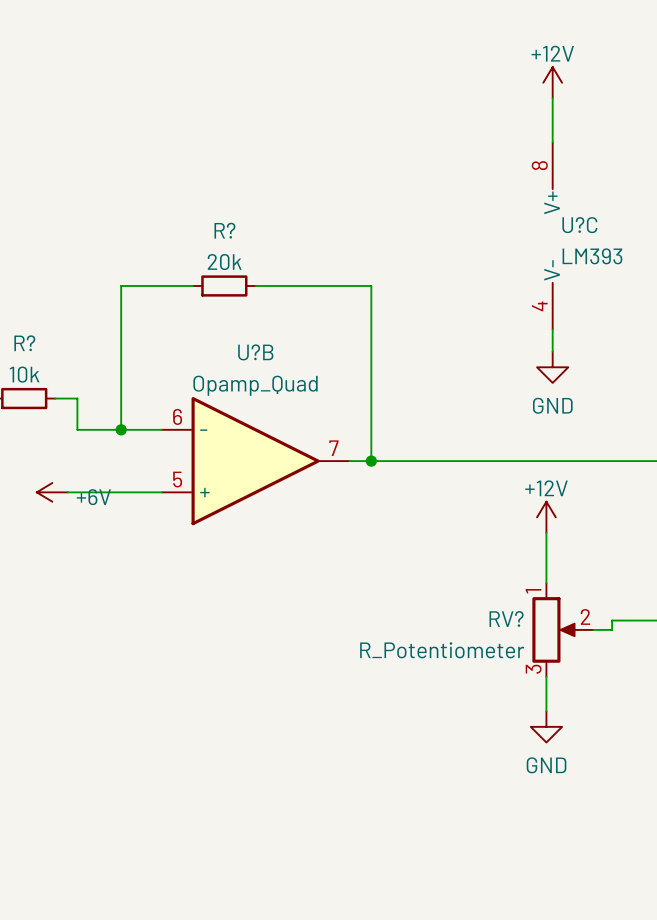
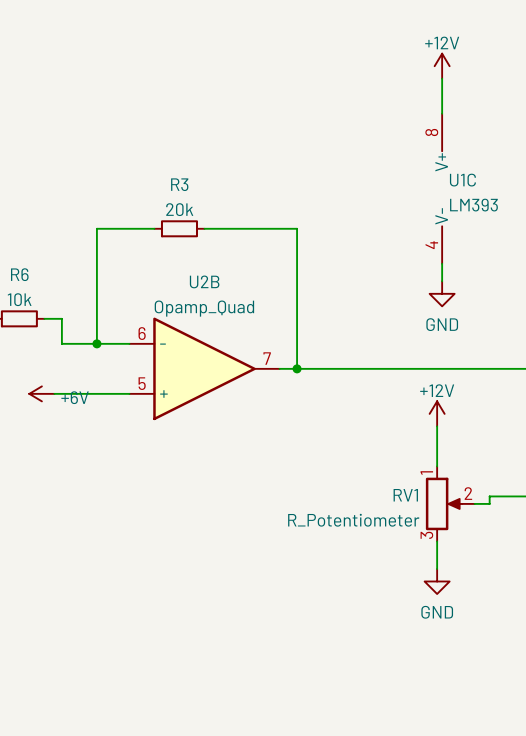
U?C name: U?C (579, 225) -> U1C (462, 180)
R? name: R? (224, 230) -> R3 (179, 184)
R? name: R? (24, 343) -> R6 (19, 274)
U?B name: U?B (255, 352) -> U2B (204, 281)
RV? name: RV? (506, 618) -> RV1 (405, 495)

